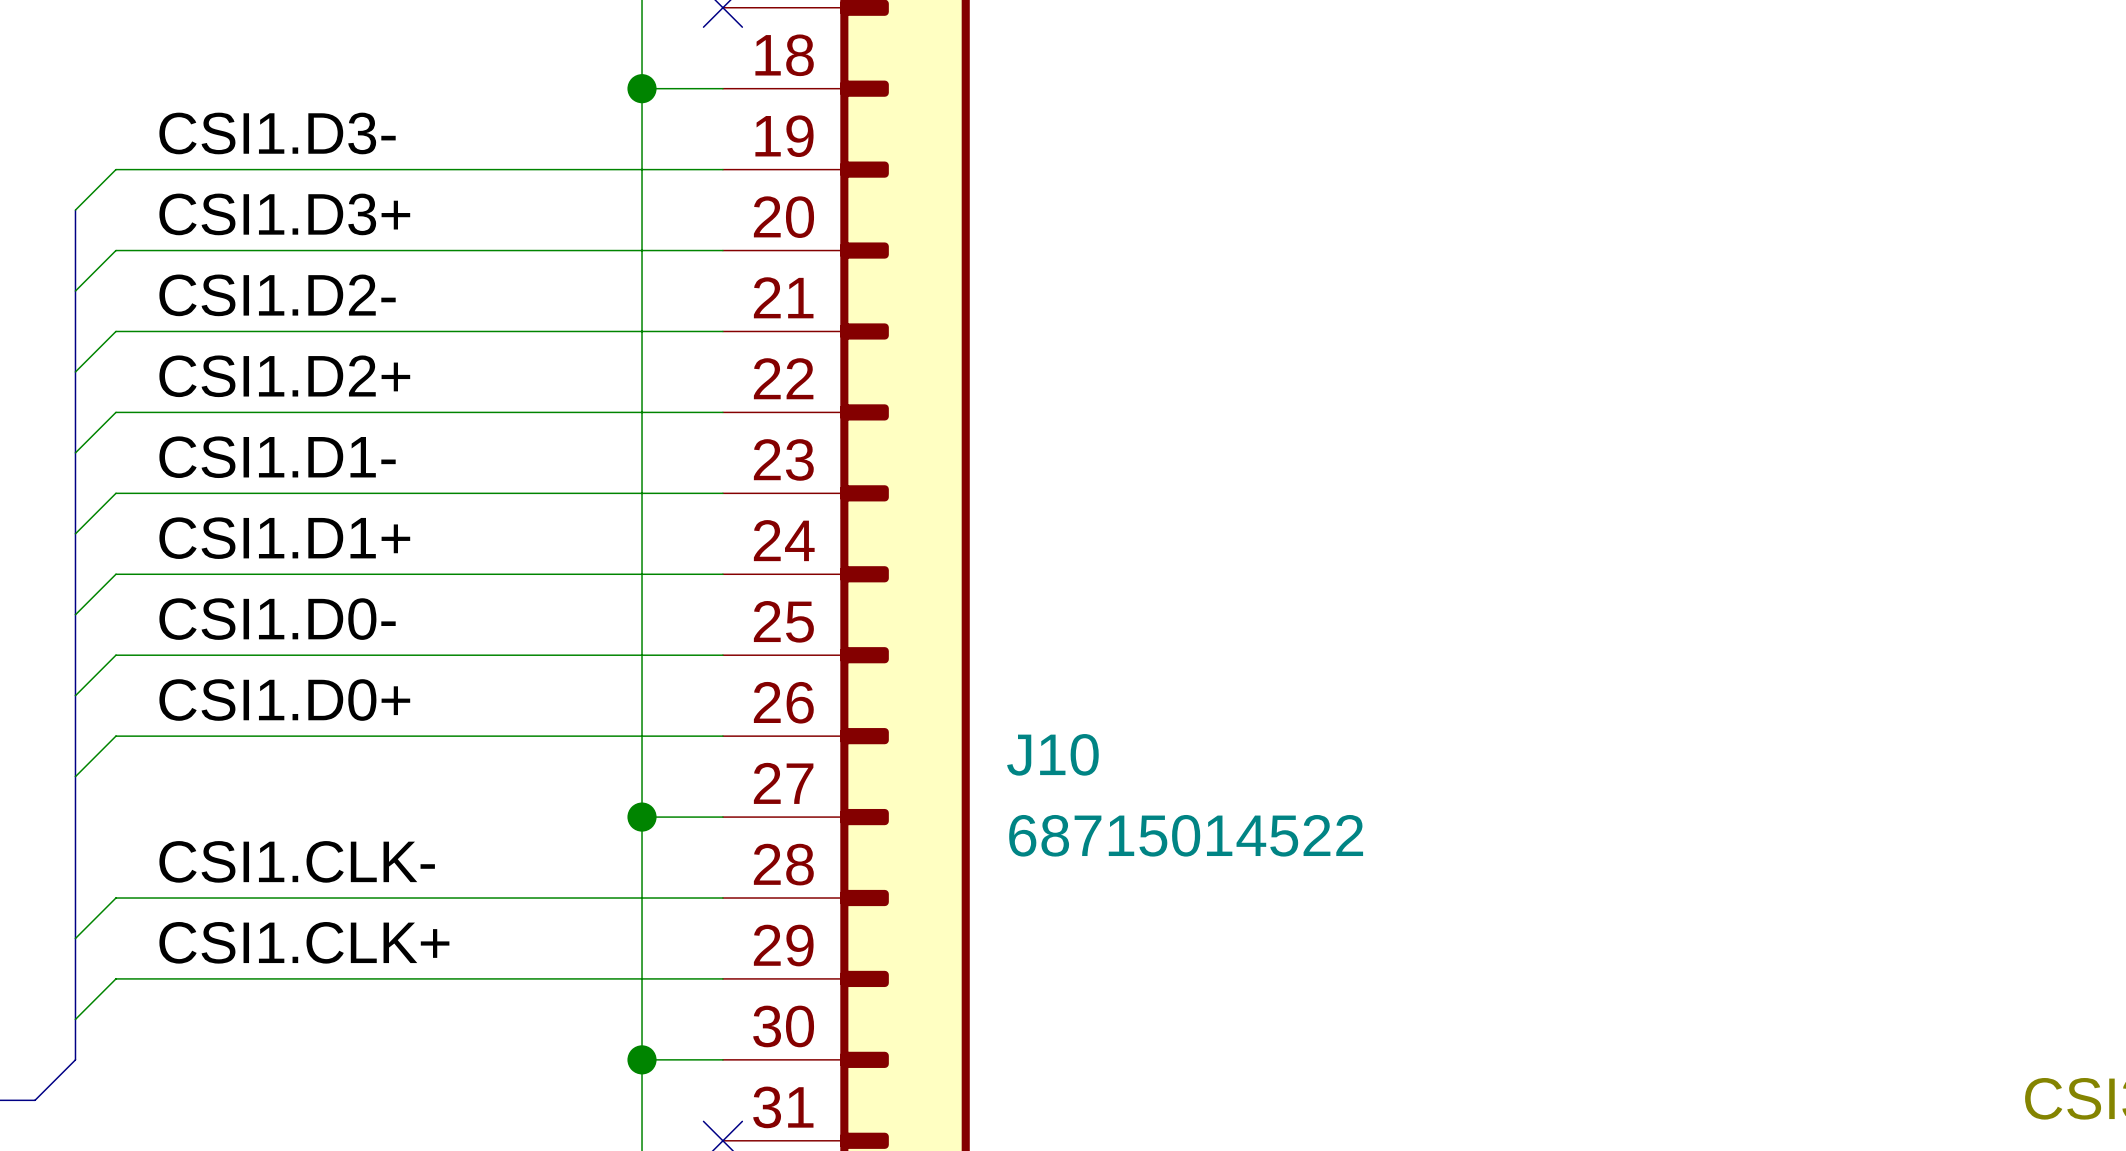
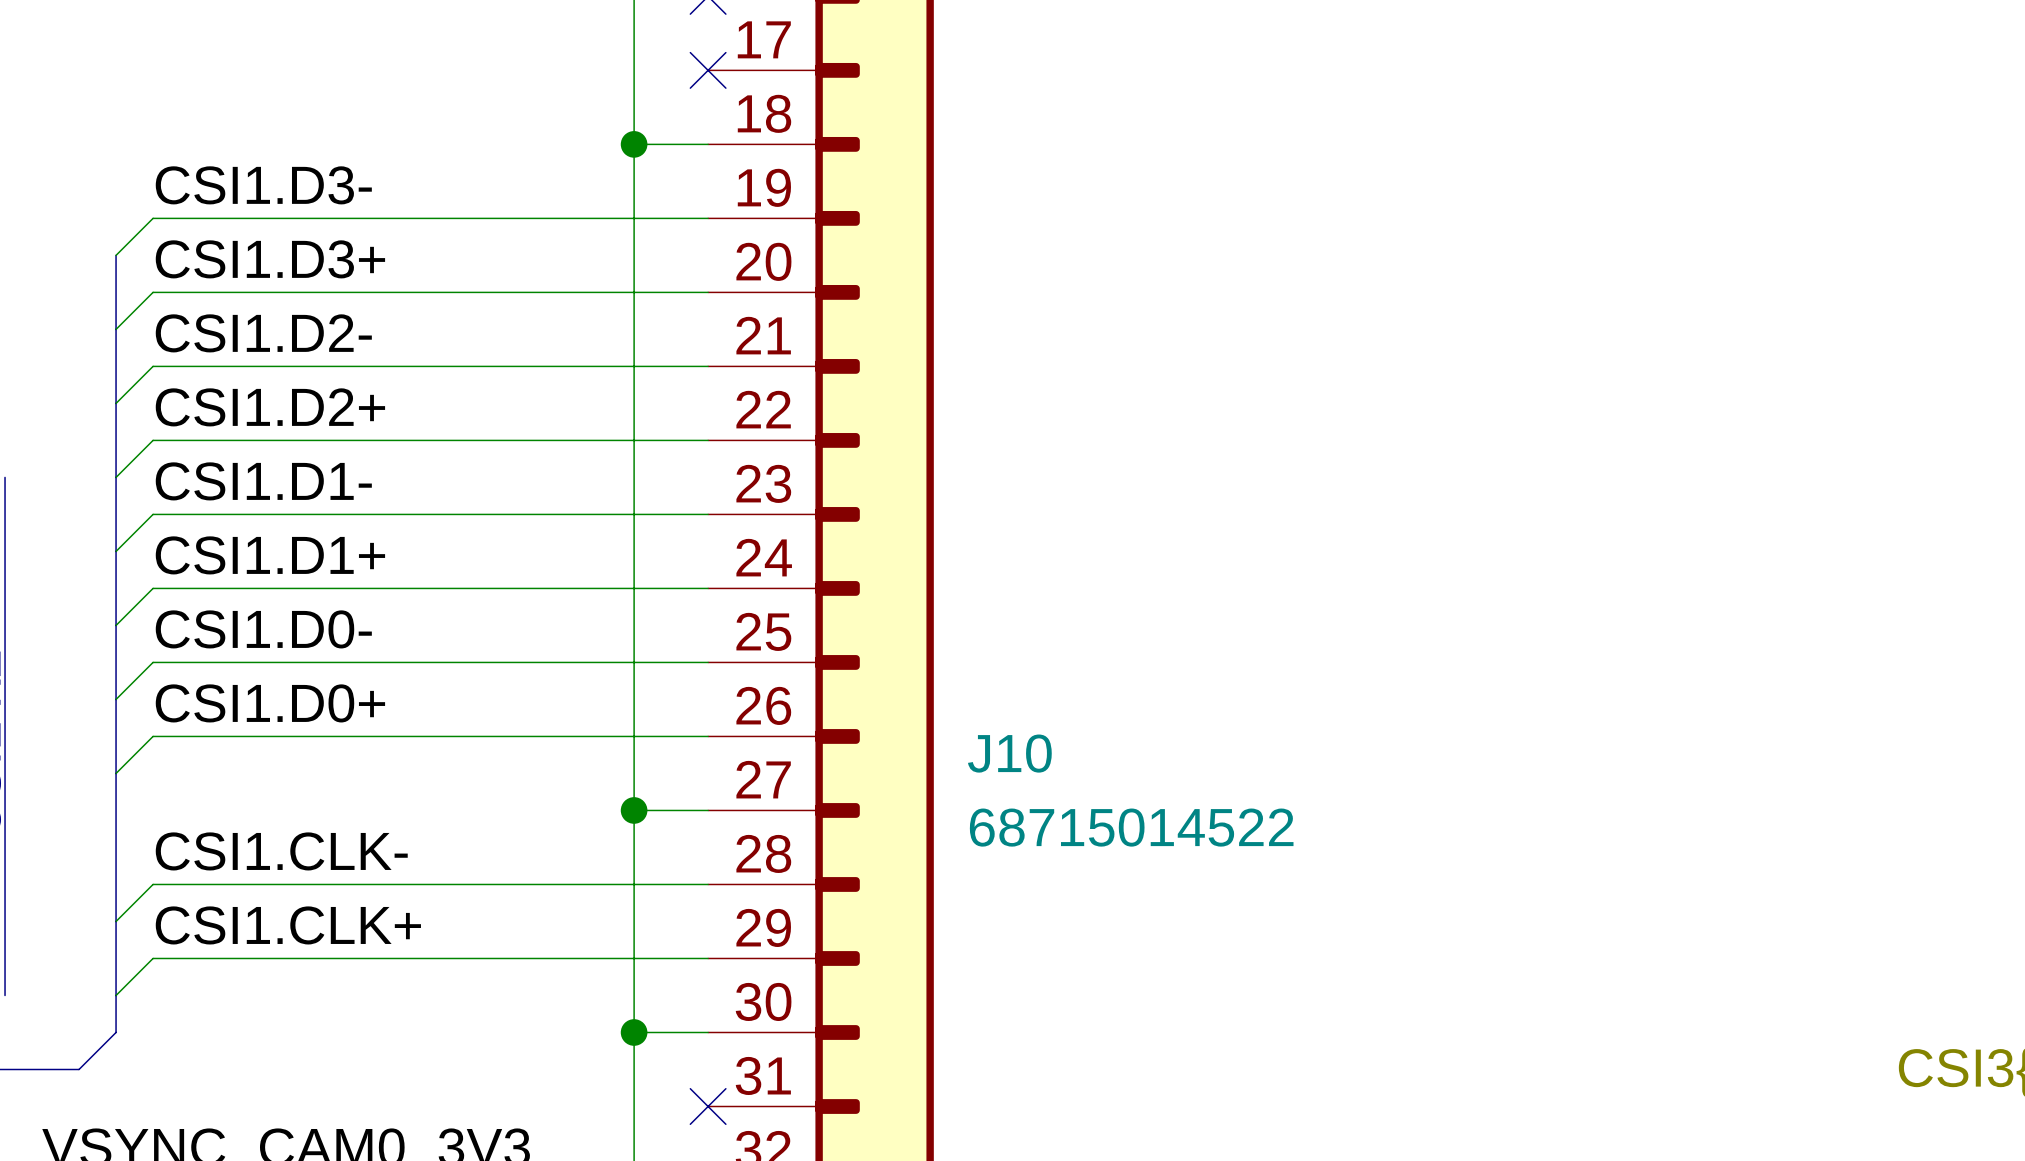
label position: CSI1.D3- (277, 133) -> CSI1.D3- (263, 185)
label position: CSI1.D3+ (284, 214) -> CSI1.D3+ (270, 259)
label position: CSI1.D2- (277, 295) -> CSI1.D2- (263, 333)
label position: CSI1.D2+ (284, 376) -> CSI1.D2+ (270, 407)
label position: CSI1.D1- (277, 457) -> CSI1.D1- (263, 481)
label position: CSI1.D1+ (284, 538) -> CSI1.D1+ (270, 555)
label position: CSI1.D0- (277, 619) -> CSI1.D0- (263, 629)
label position: CSI1.D0+ (284, 700) -> CSI1.D0+ (270, 703)
label position: CSI1.CLK- (297, 861) -> CSI1.CLK- (281, 851)
label position: CSI1.CLK+ (304, 942) -> CSI1.CLK+ (288, 925)

